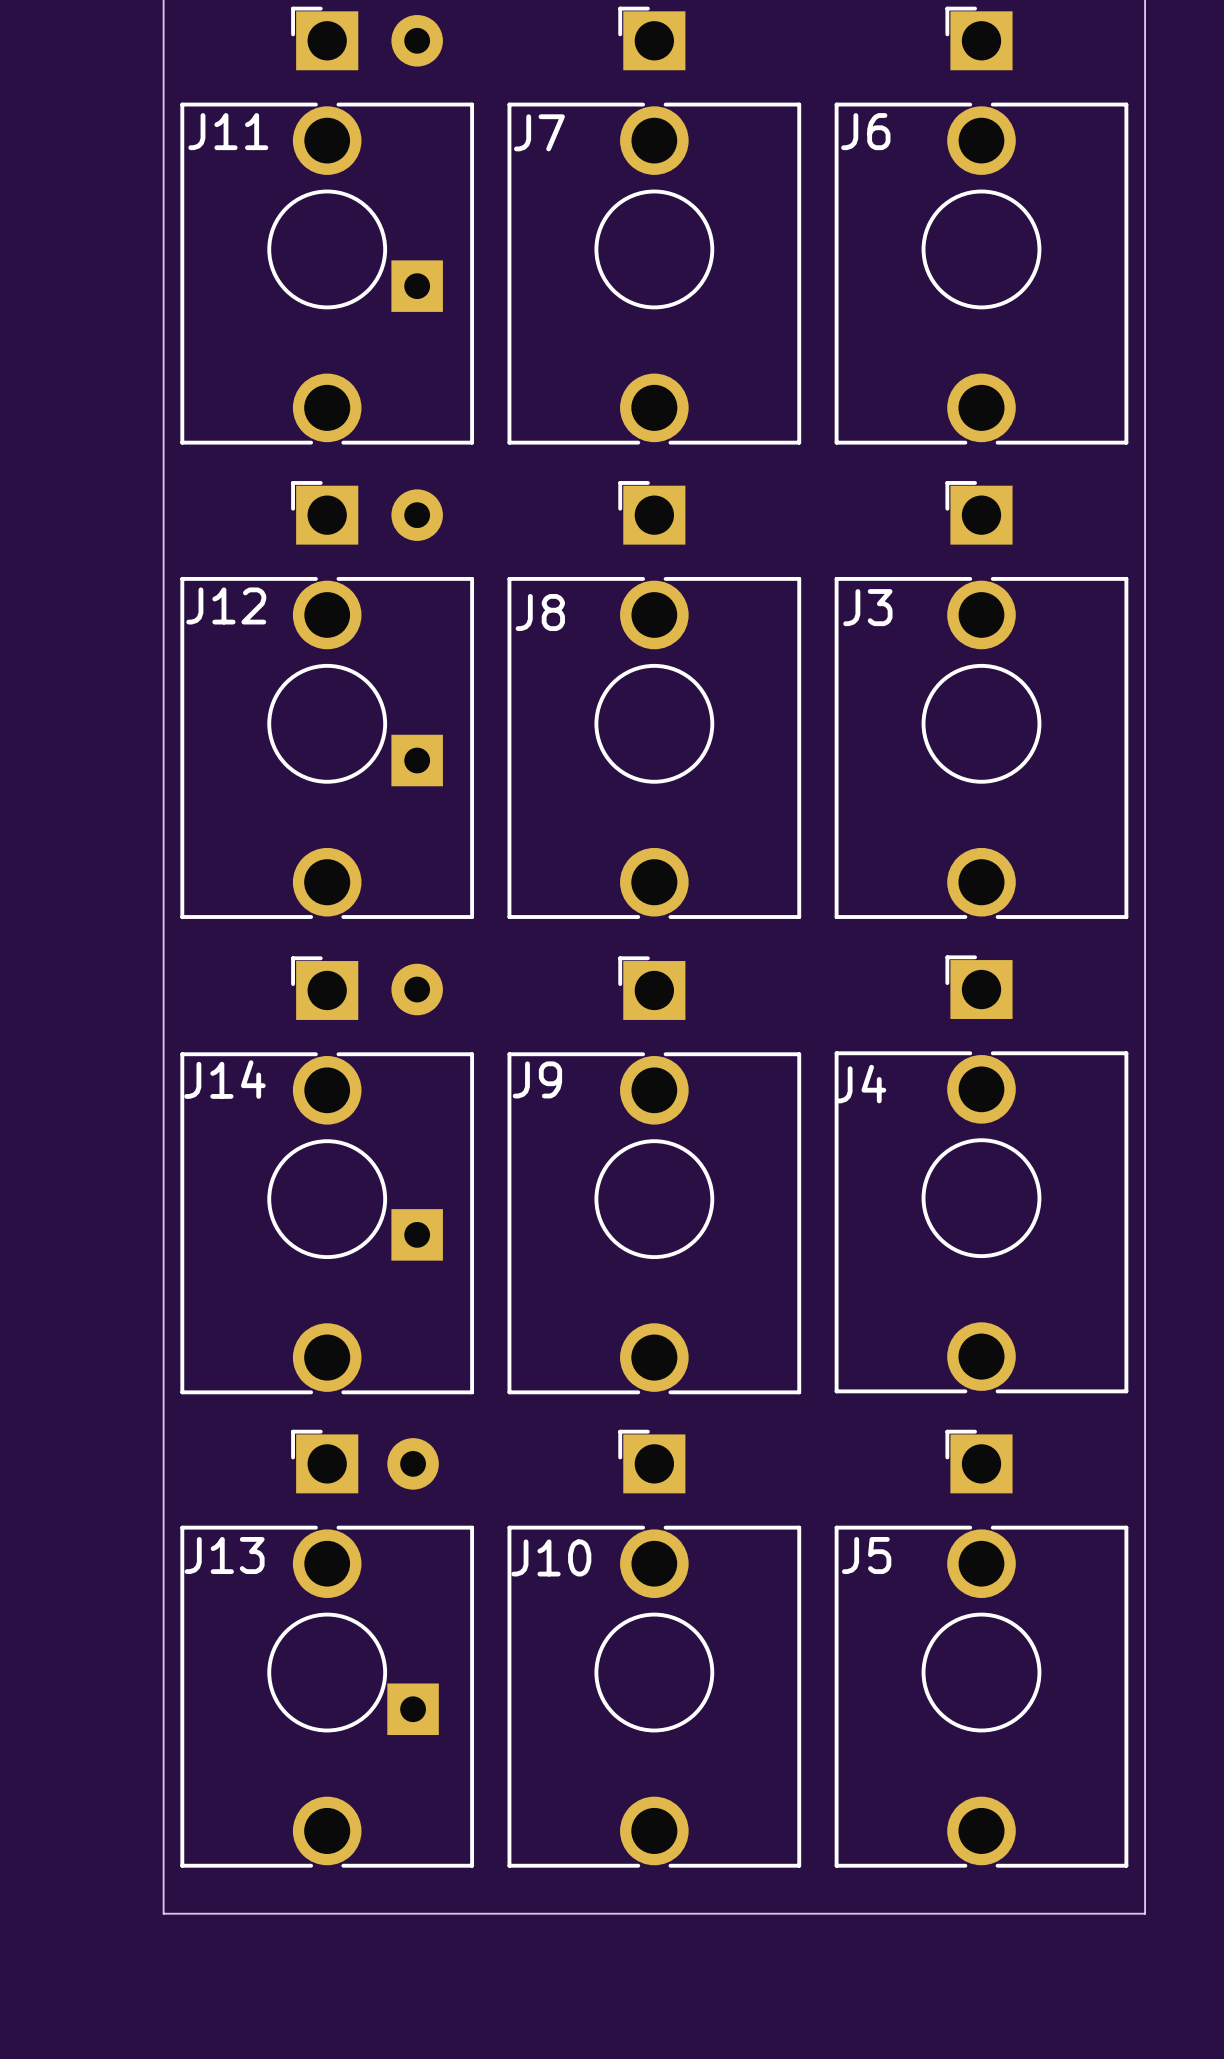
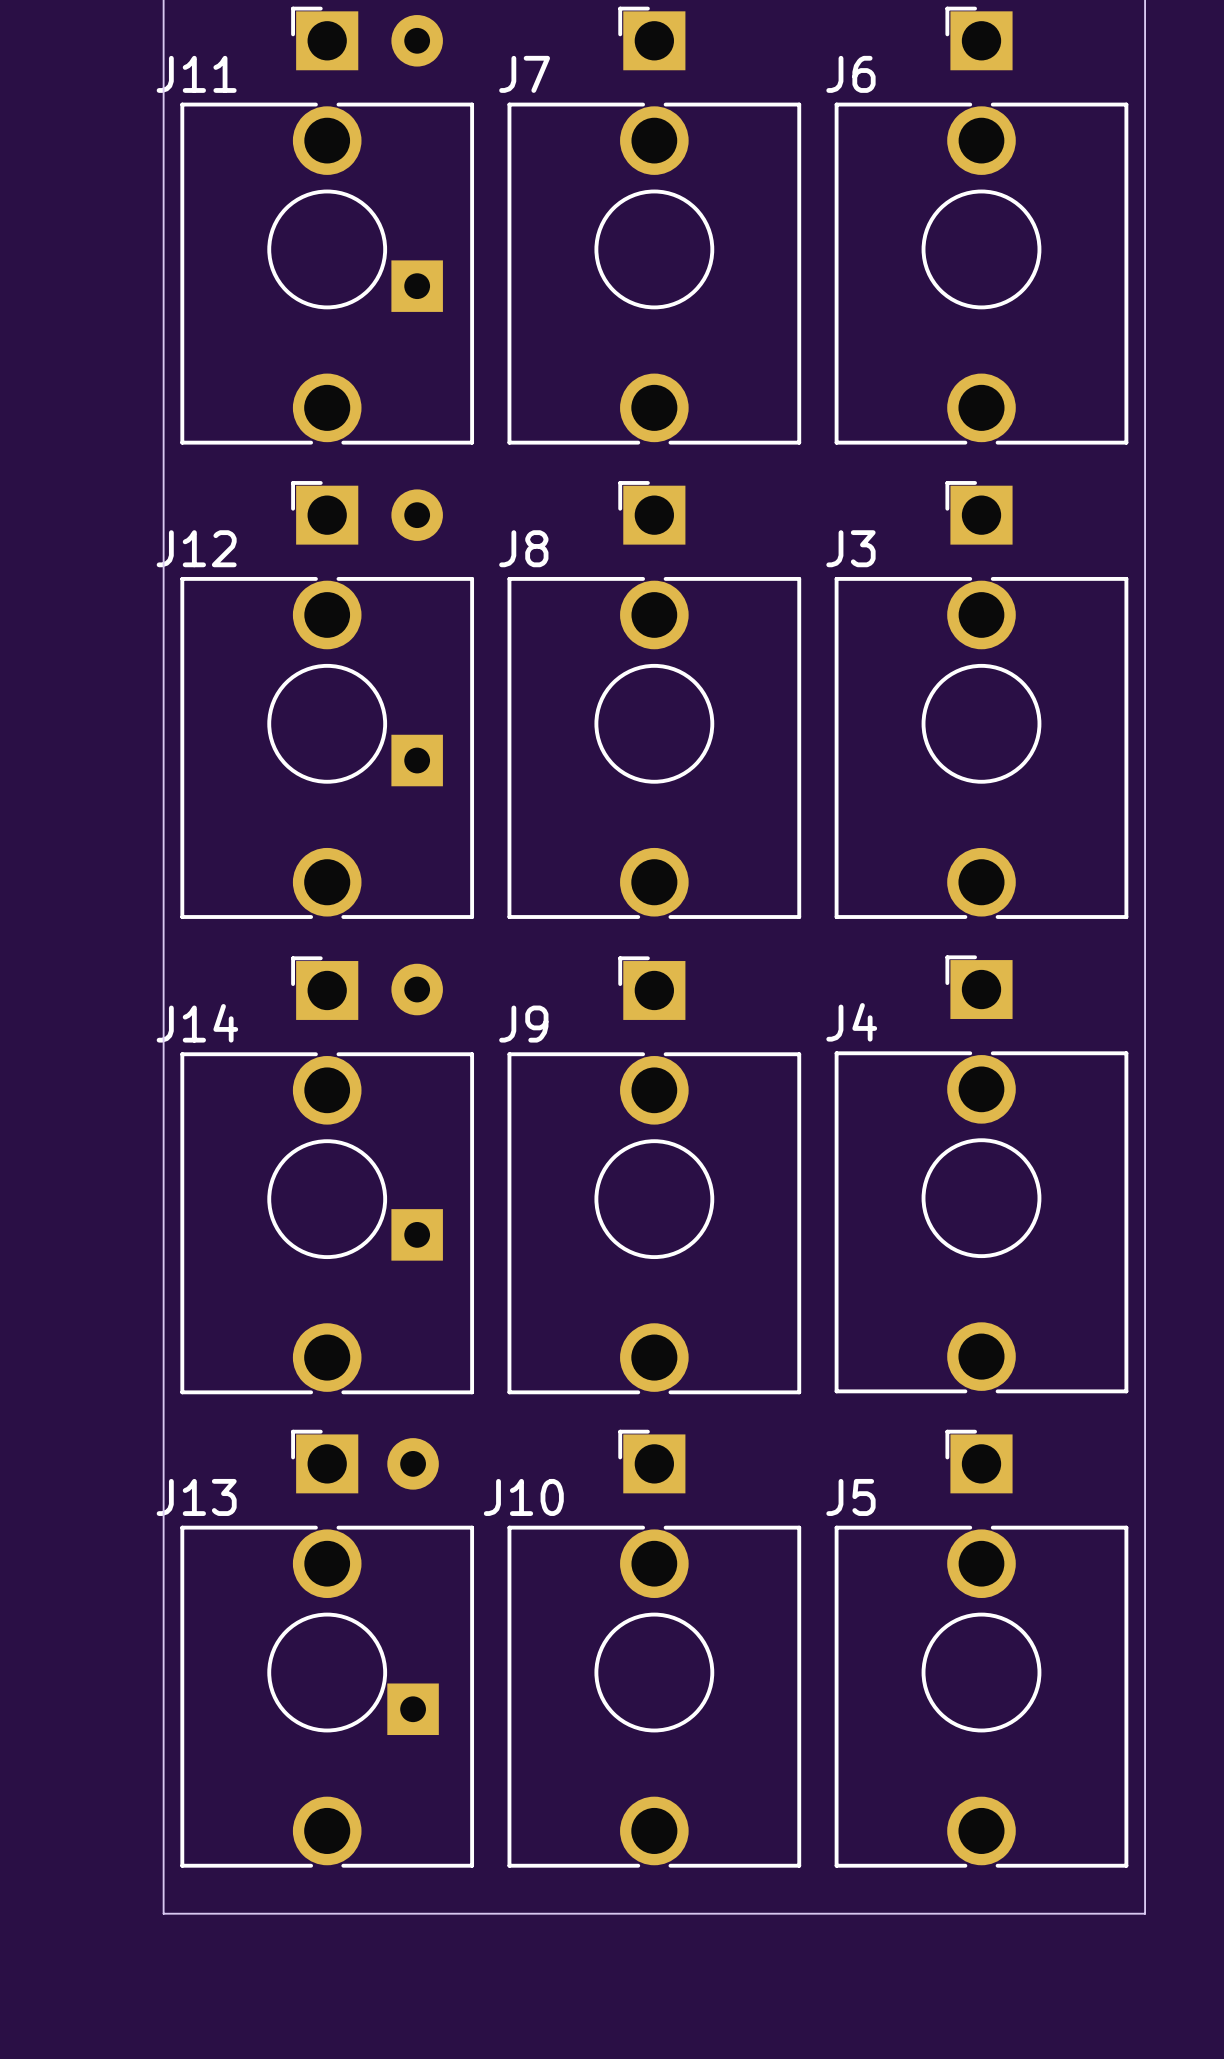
J11 name position: J11 (228, 131) -> J11 (196, 74)
J6 name position: J6 (865, 131) -> J6 (850, 74)
J7 name position: J7 (539, 132) -> J7 (524, 74)
J12 name position: J12 (226, 605) -> J12 (196, 548)
J3 name position: J3 (867, 607) -> J3 (850, 548)
J8 name position: J8 (540, 612) -> J8 (523, 548)
J14 name position: J14 (224, 1079) -> J14 (197, 1023)
J9 name position: J9 (537, 1079) -> J9 (523, 1024)
J4 name position: J4 (860, 1084) -> J4 (851, 1022)
J13 name position: J13 (224, 1555) -> J13 (196, 1497)
J5 name position: J5 (866, 1555) -> J5 (850, 1497)
J10 name position: J10 (551, 1557) -> J10 (523, 1497)

